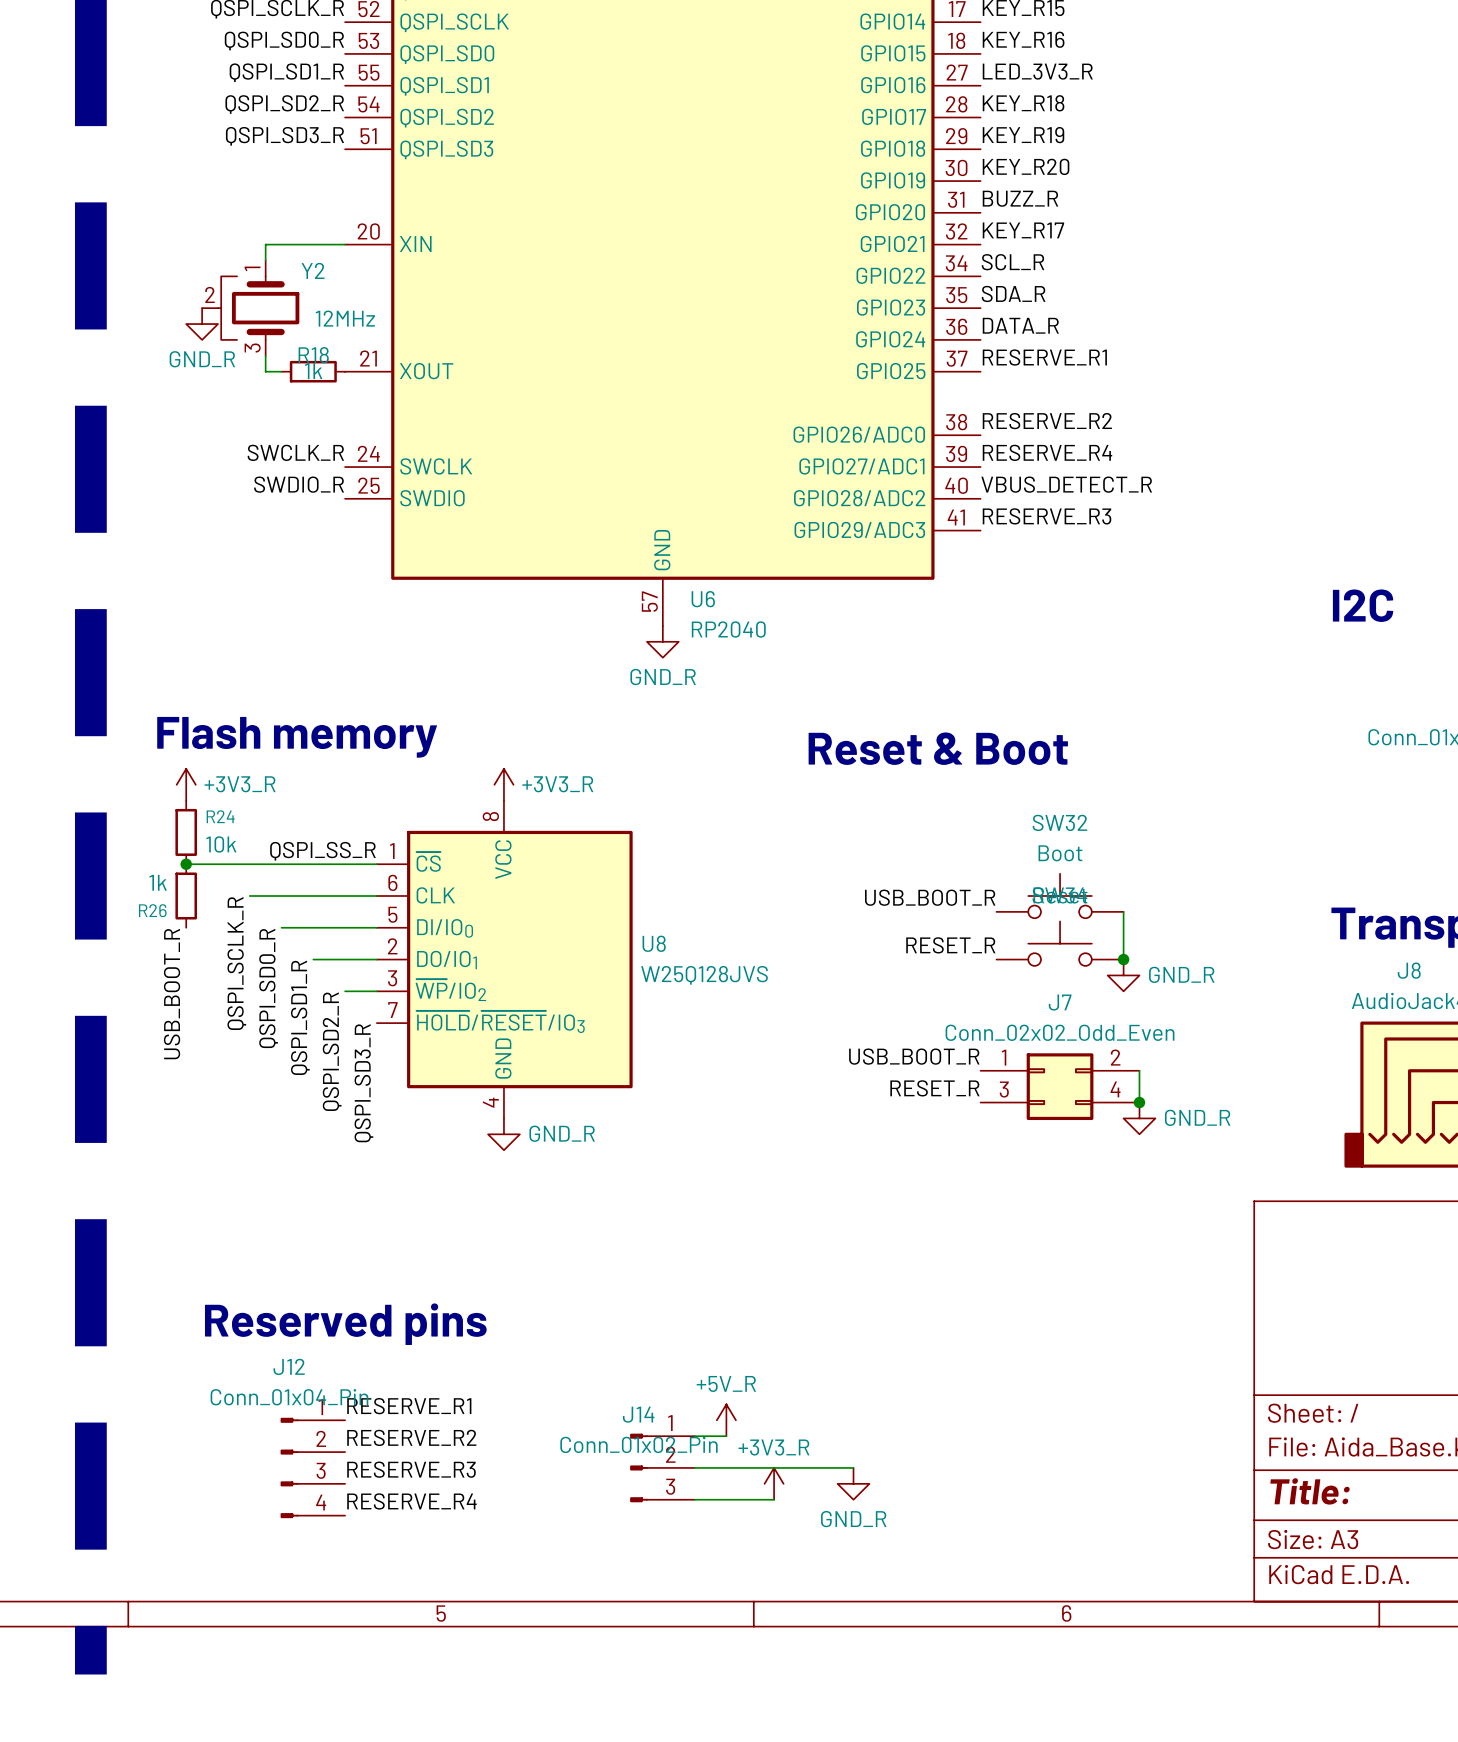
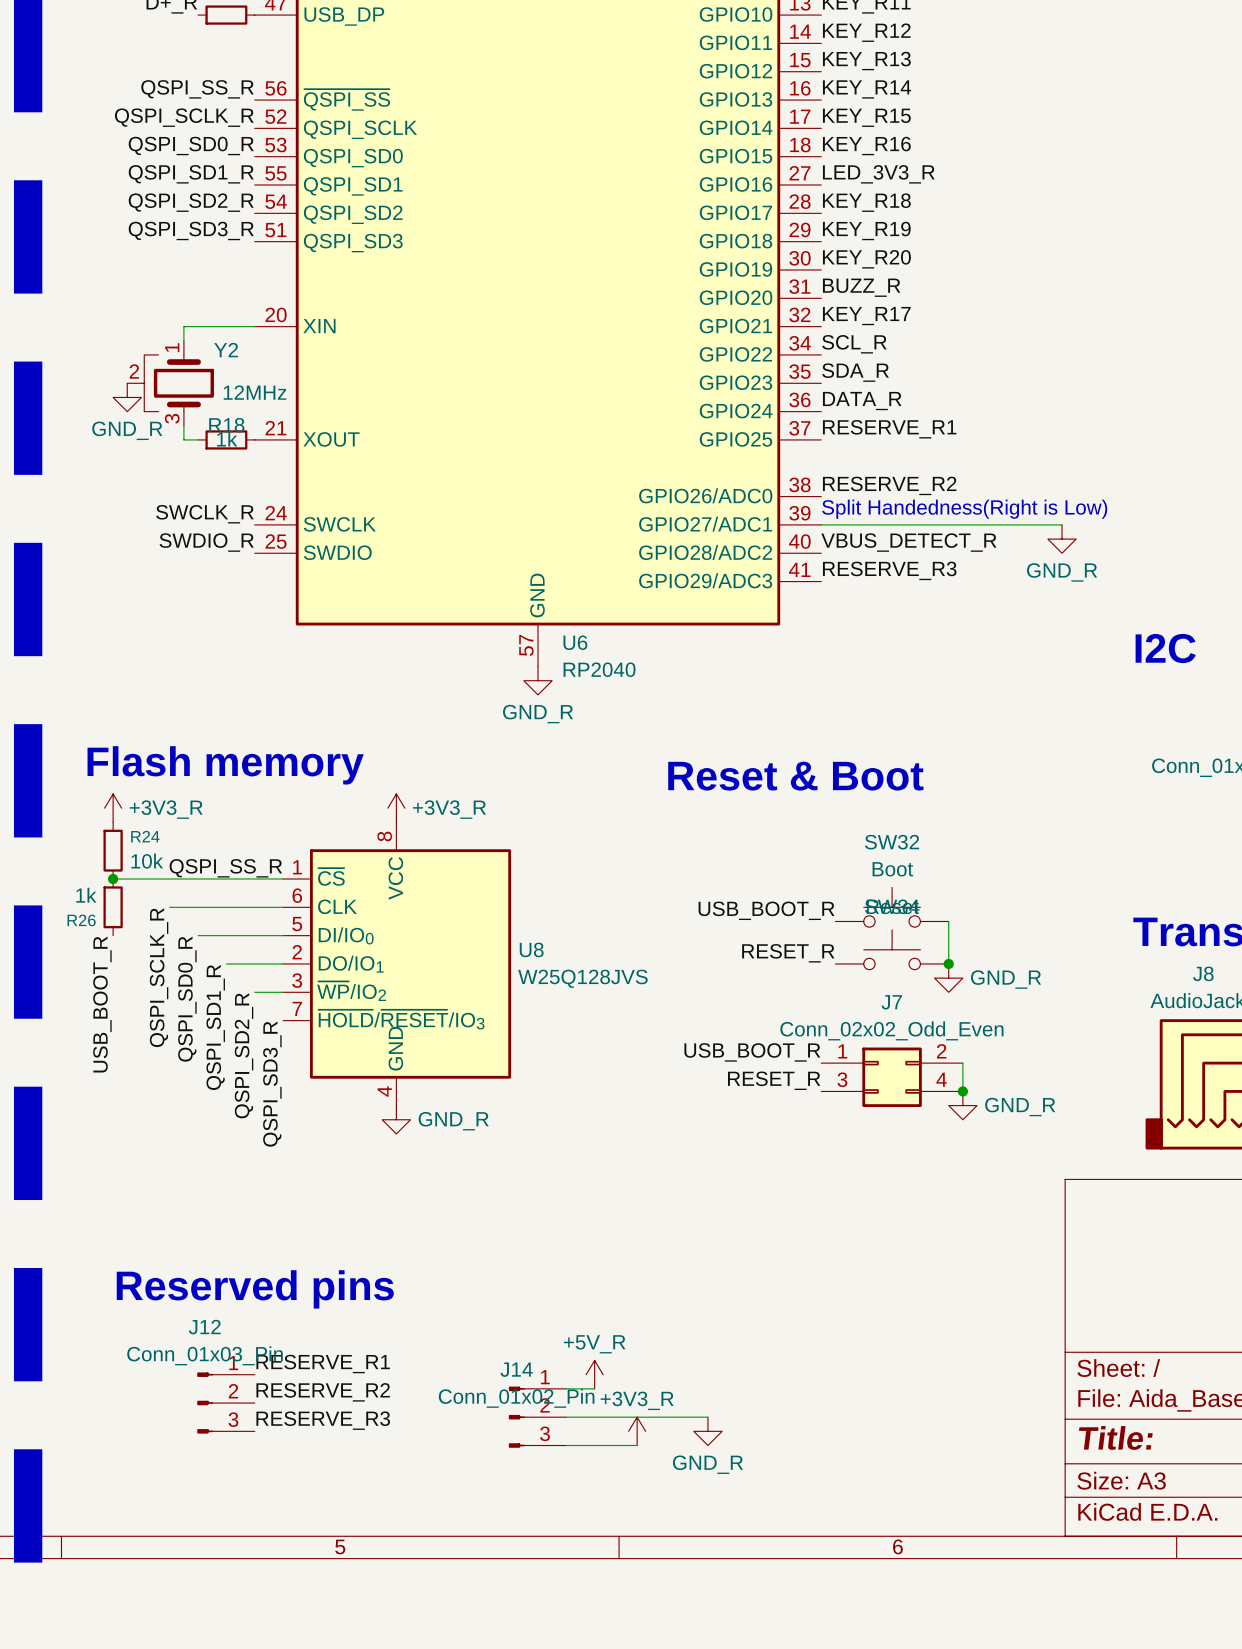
text: none -> Split Handedness(Right is Low) (964, 509)
label: RESERVE_R4 (1047, 452) -> none
wire: none -> (821, 524) (1062, 524)
power symbol: none -> GND_R (1062, 539)
J12 value: Conn_01x04_Pin (289, 1397) -> Conn_01x03_Pin (205, 1355)
J12 symbol: [280, 1417, 346, 1519] -> [197, 1372, 255, 1434]
label: RESERVE_R4 (411, 1501) -> none

